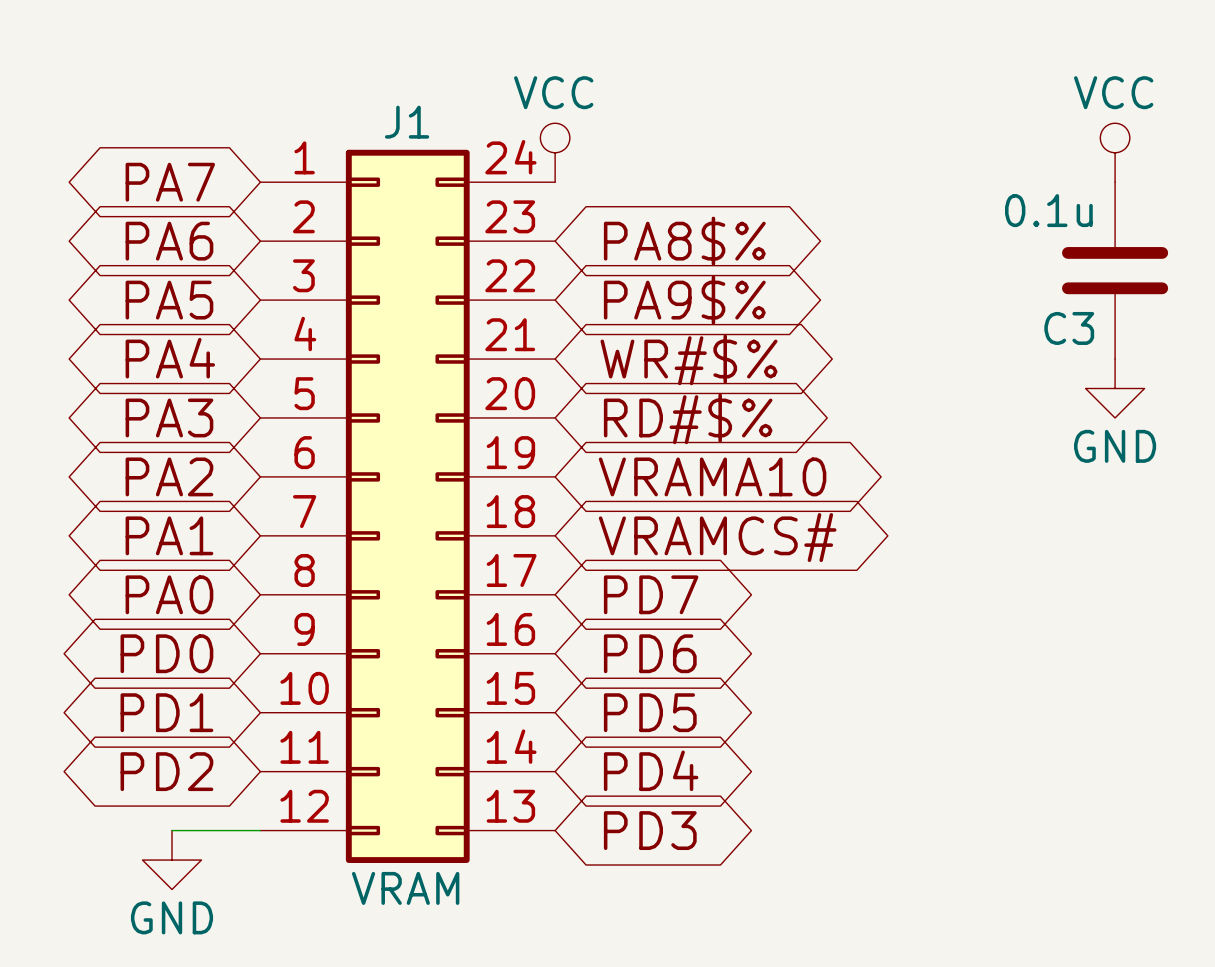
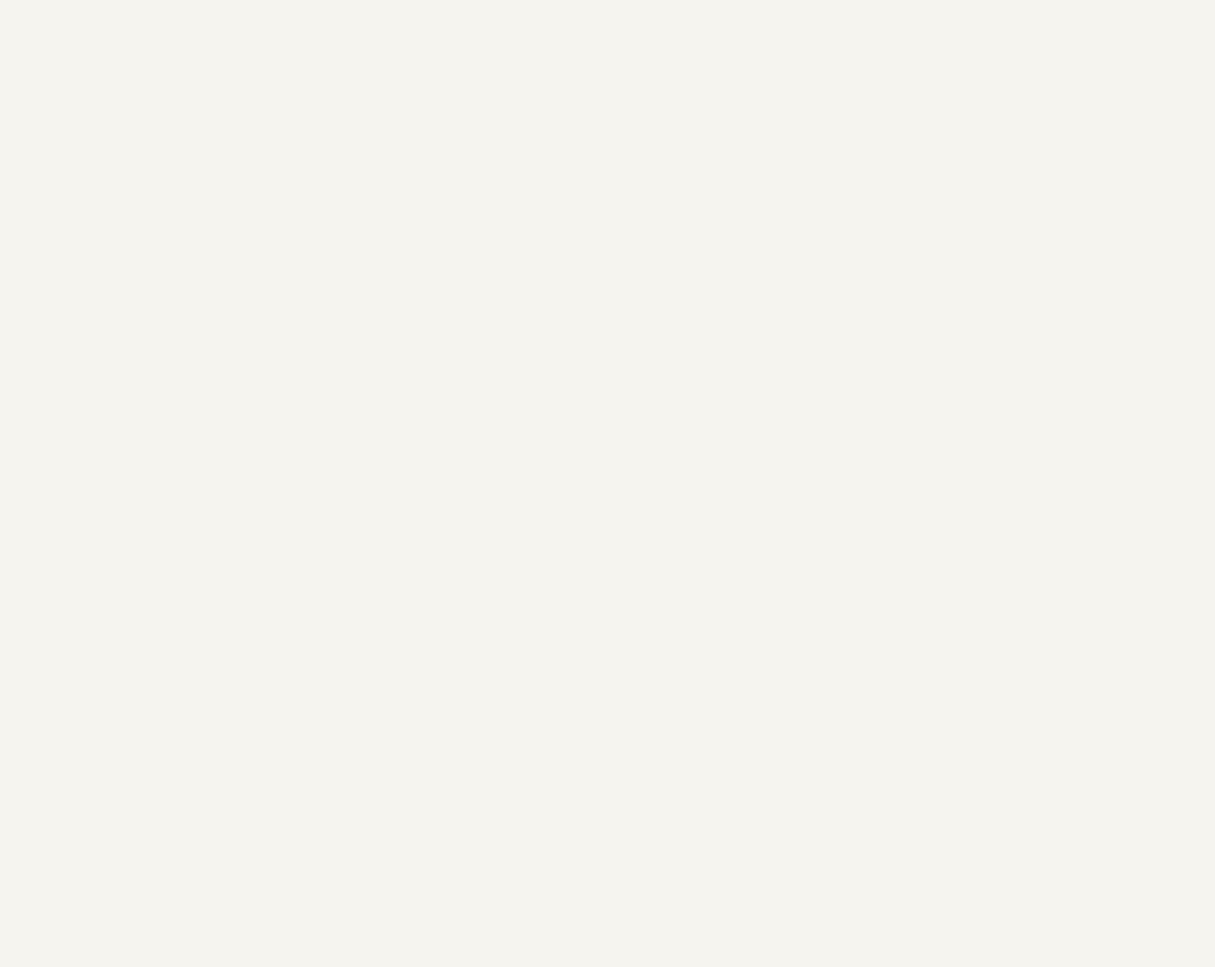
power symbol: VCC (555, 152) -> none
power symbol: VCC (1115, 152) -> none
global label: PA7 (170, 182) -> none
global label: PA6 (169, 241) -> none
global label: PA8$% (684, 241) -> none
C3: 0.1u (1115, 270) -> none
global label: PA5 (169, 300) -> none
global label: PA9$% (684, 300) -> none
global label: PA4 (170, 358) -> none
global label: WR#$% (689, 359) -> none
power symbol: GND (1115, 388) -> none
global label: PA3 (169, 417) -> none
global label: RD#$% (688, 418) -> none
global label: PA2 (169, 476) -> none
global label: VRAMA10 (712, 476) -> none
J1: VRAM (407, 506) -> none
global label: PA1 (169, 535) -> none
global label: VRAMCS# (717, 537) -> none
global label: PA0 (169, 594) -> none
global label: PD7 (651, 594) -> none
global label: PD0 (166, 653) -> none
global label: PD6 (650, 653) -> none
global label: PD1 (166, 712) -> none
global label: PD5 (650, 712) -> none
global label: PD4 (651, 770) -> none
global label: PD2 (166, 771) -> none
wire: (171, 830) (260, 830) -> none
global label: PD3 (650, 830) -> none
power symbol: GND (171, 860) -> none

